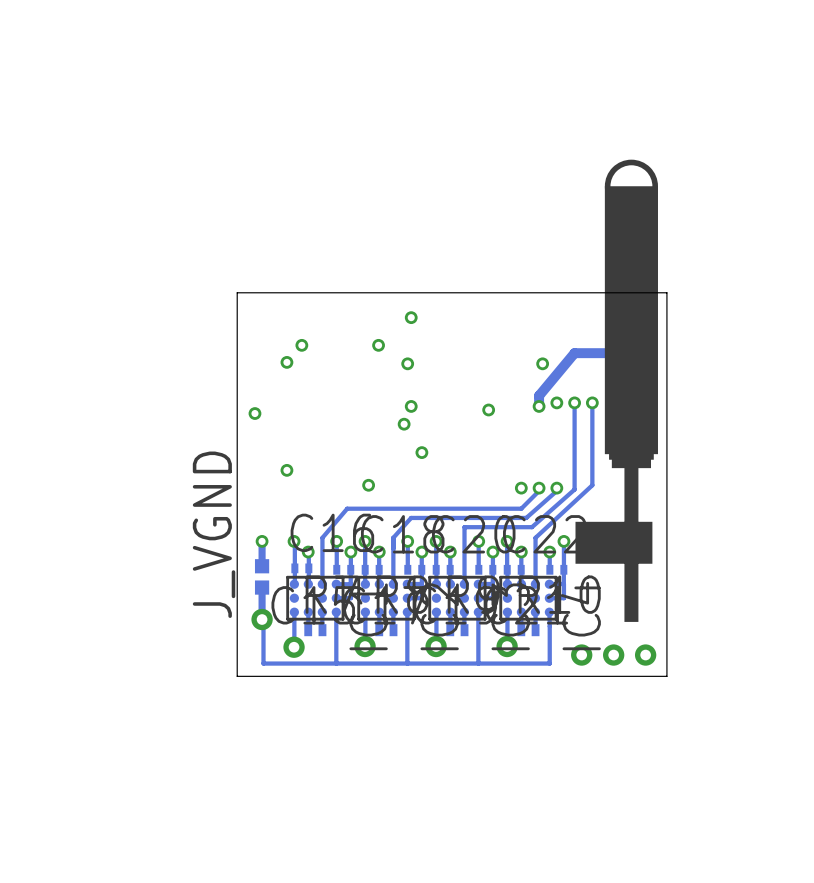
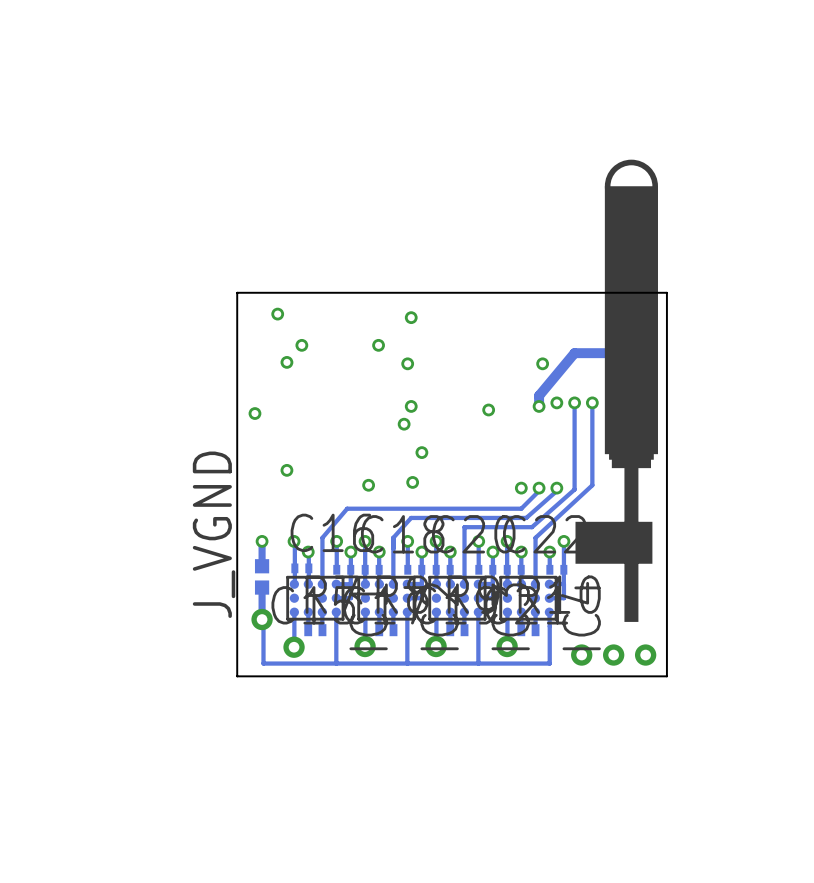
via: none -> (277, 314)
via: none -> (412, 482)

